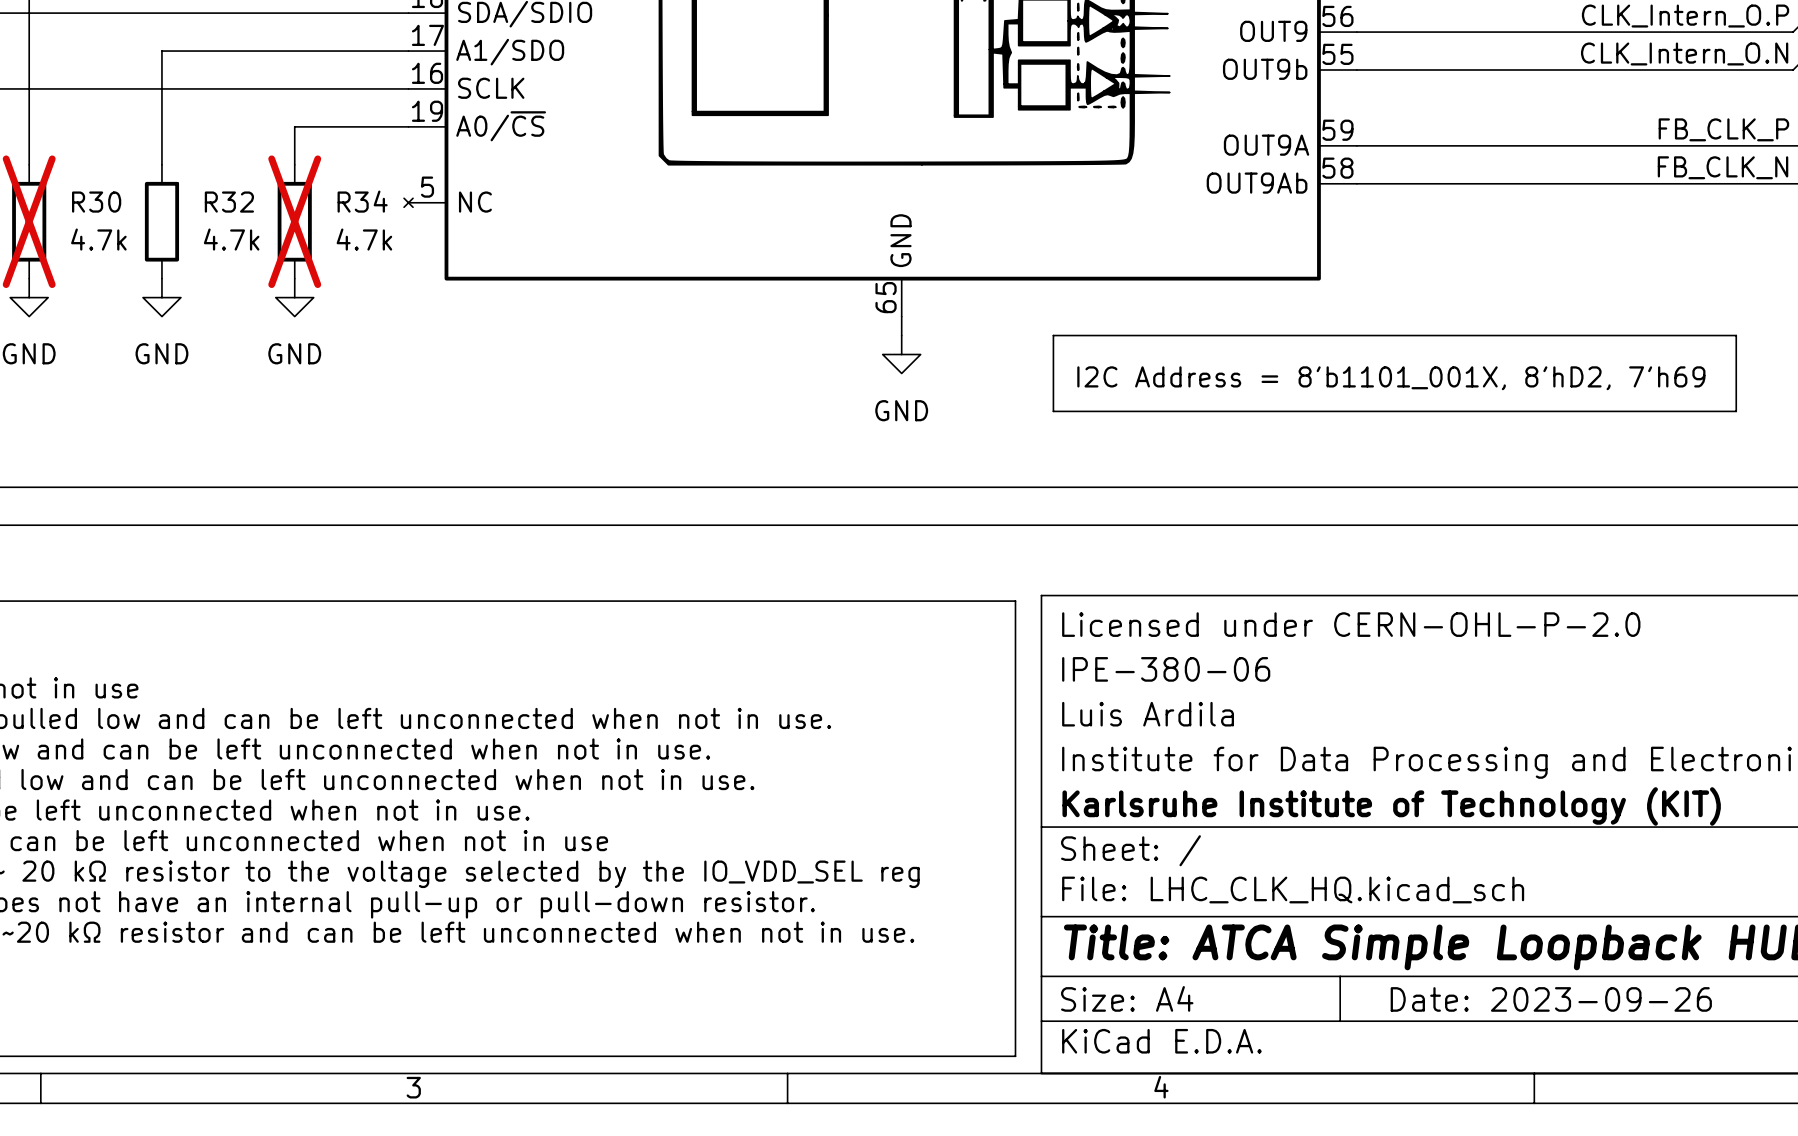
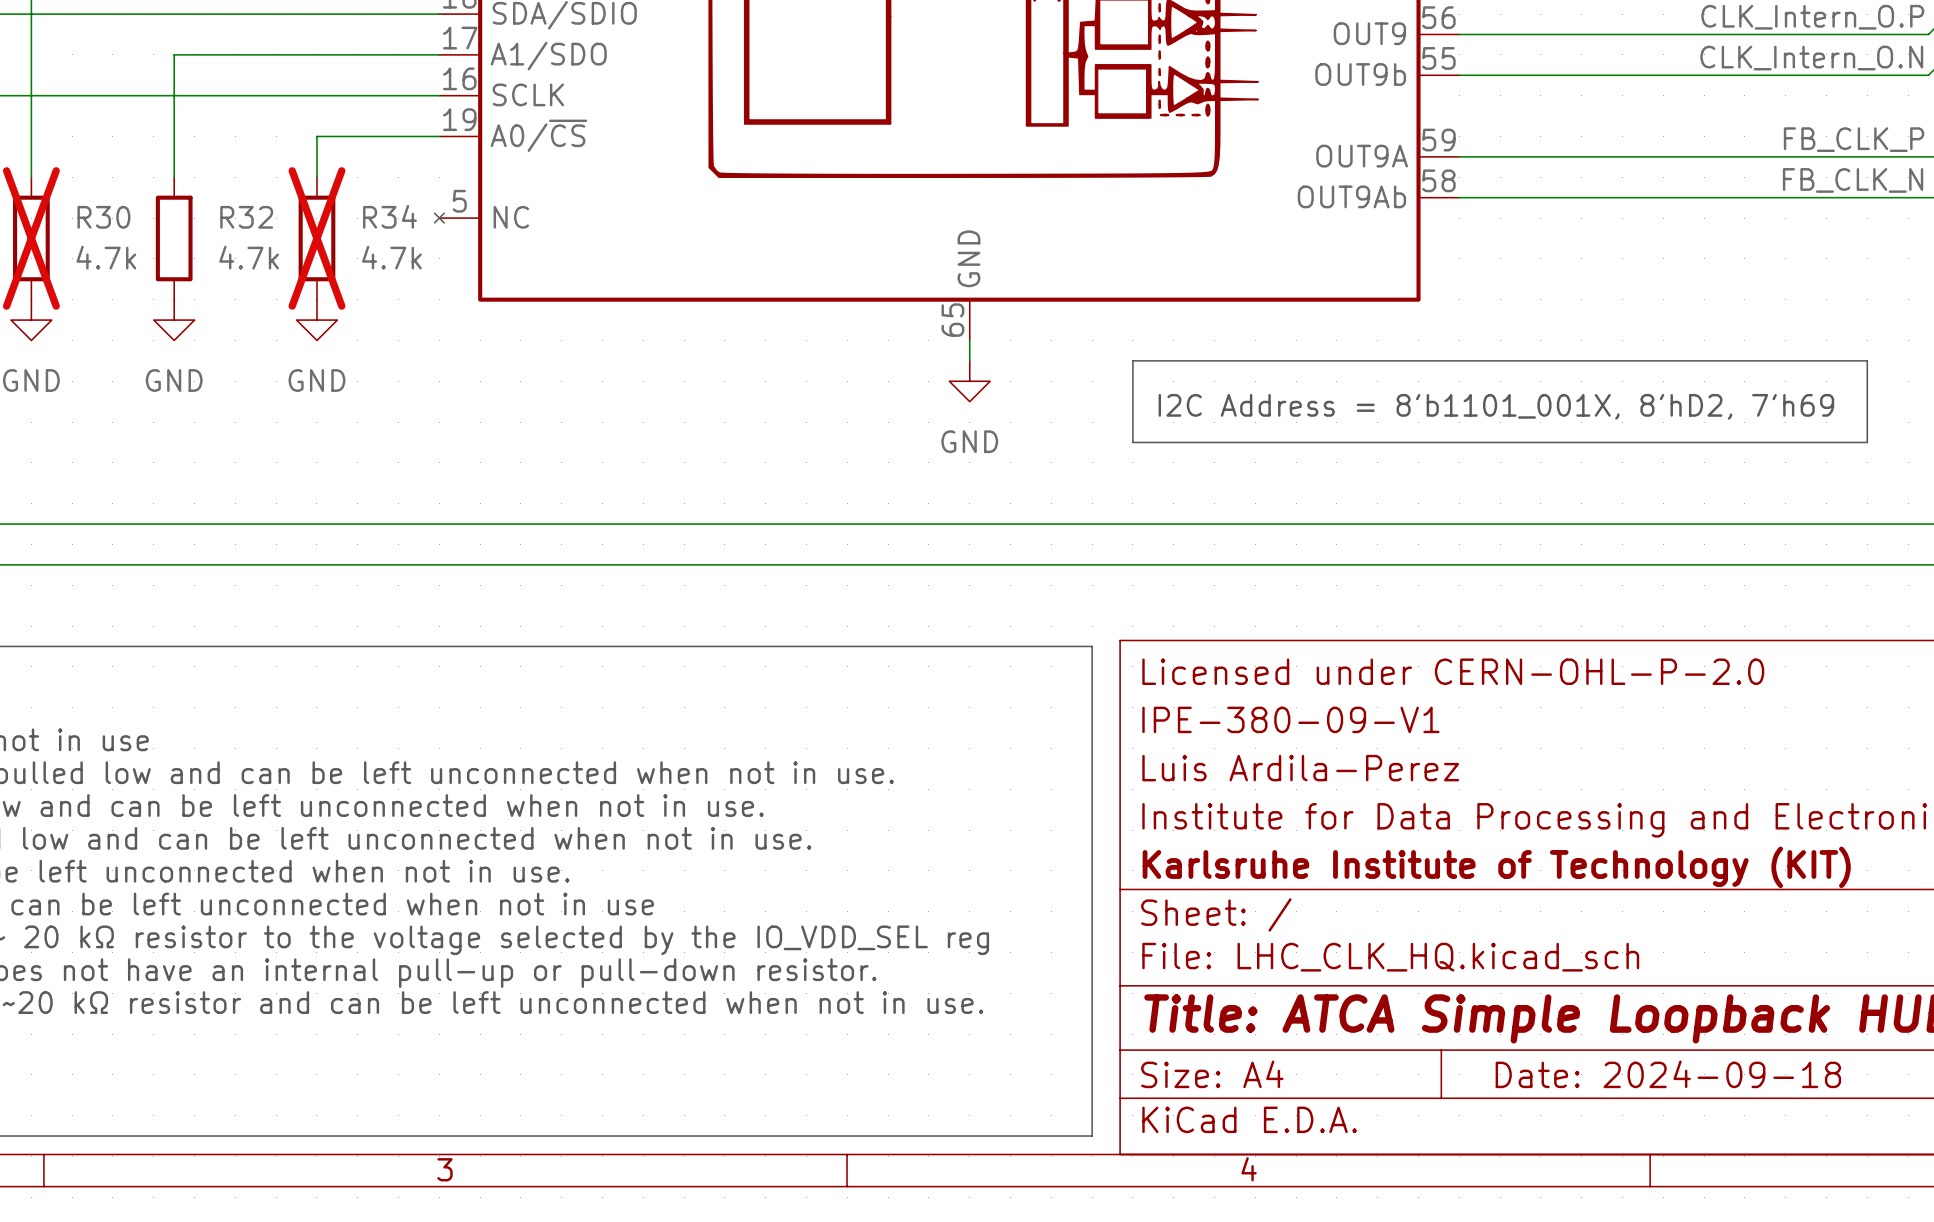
title block: IPE-380-06 (1166, 669) -> IPE-380-09-V1 (1290, 719)
title block: Luis Ardila (1148, 714) -> Luis Ardila-Perez (1300, 768)
title block: Date: 2023-09-26 (1551, 999) -> Date: 2024-09-18 (1668, 1074)

